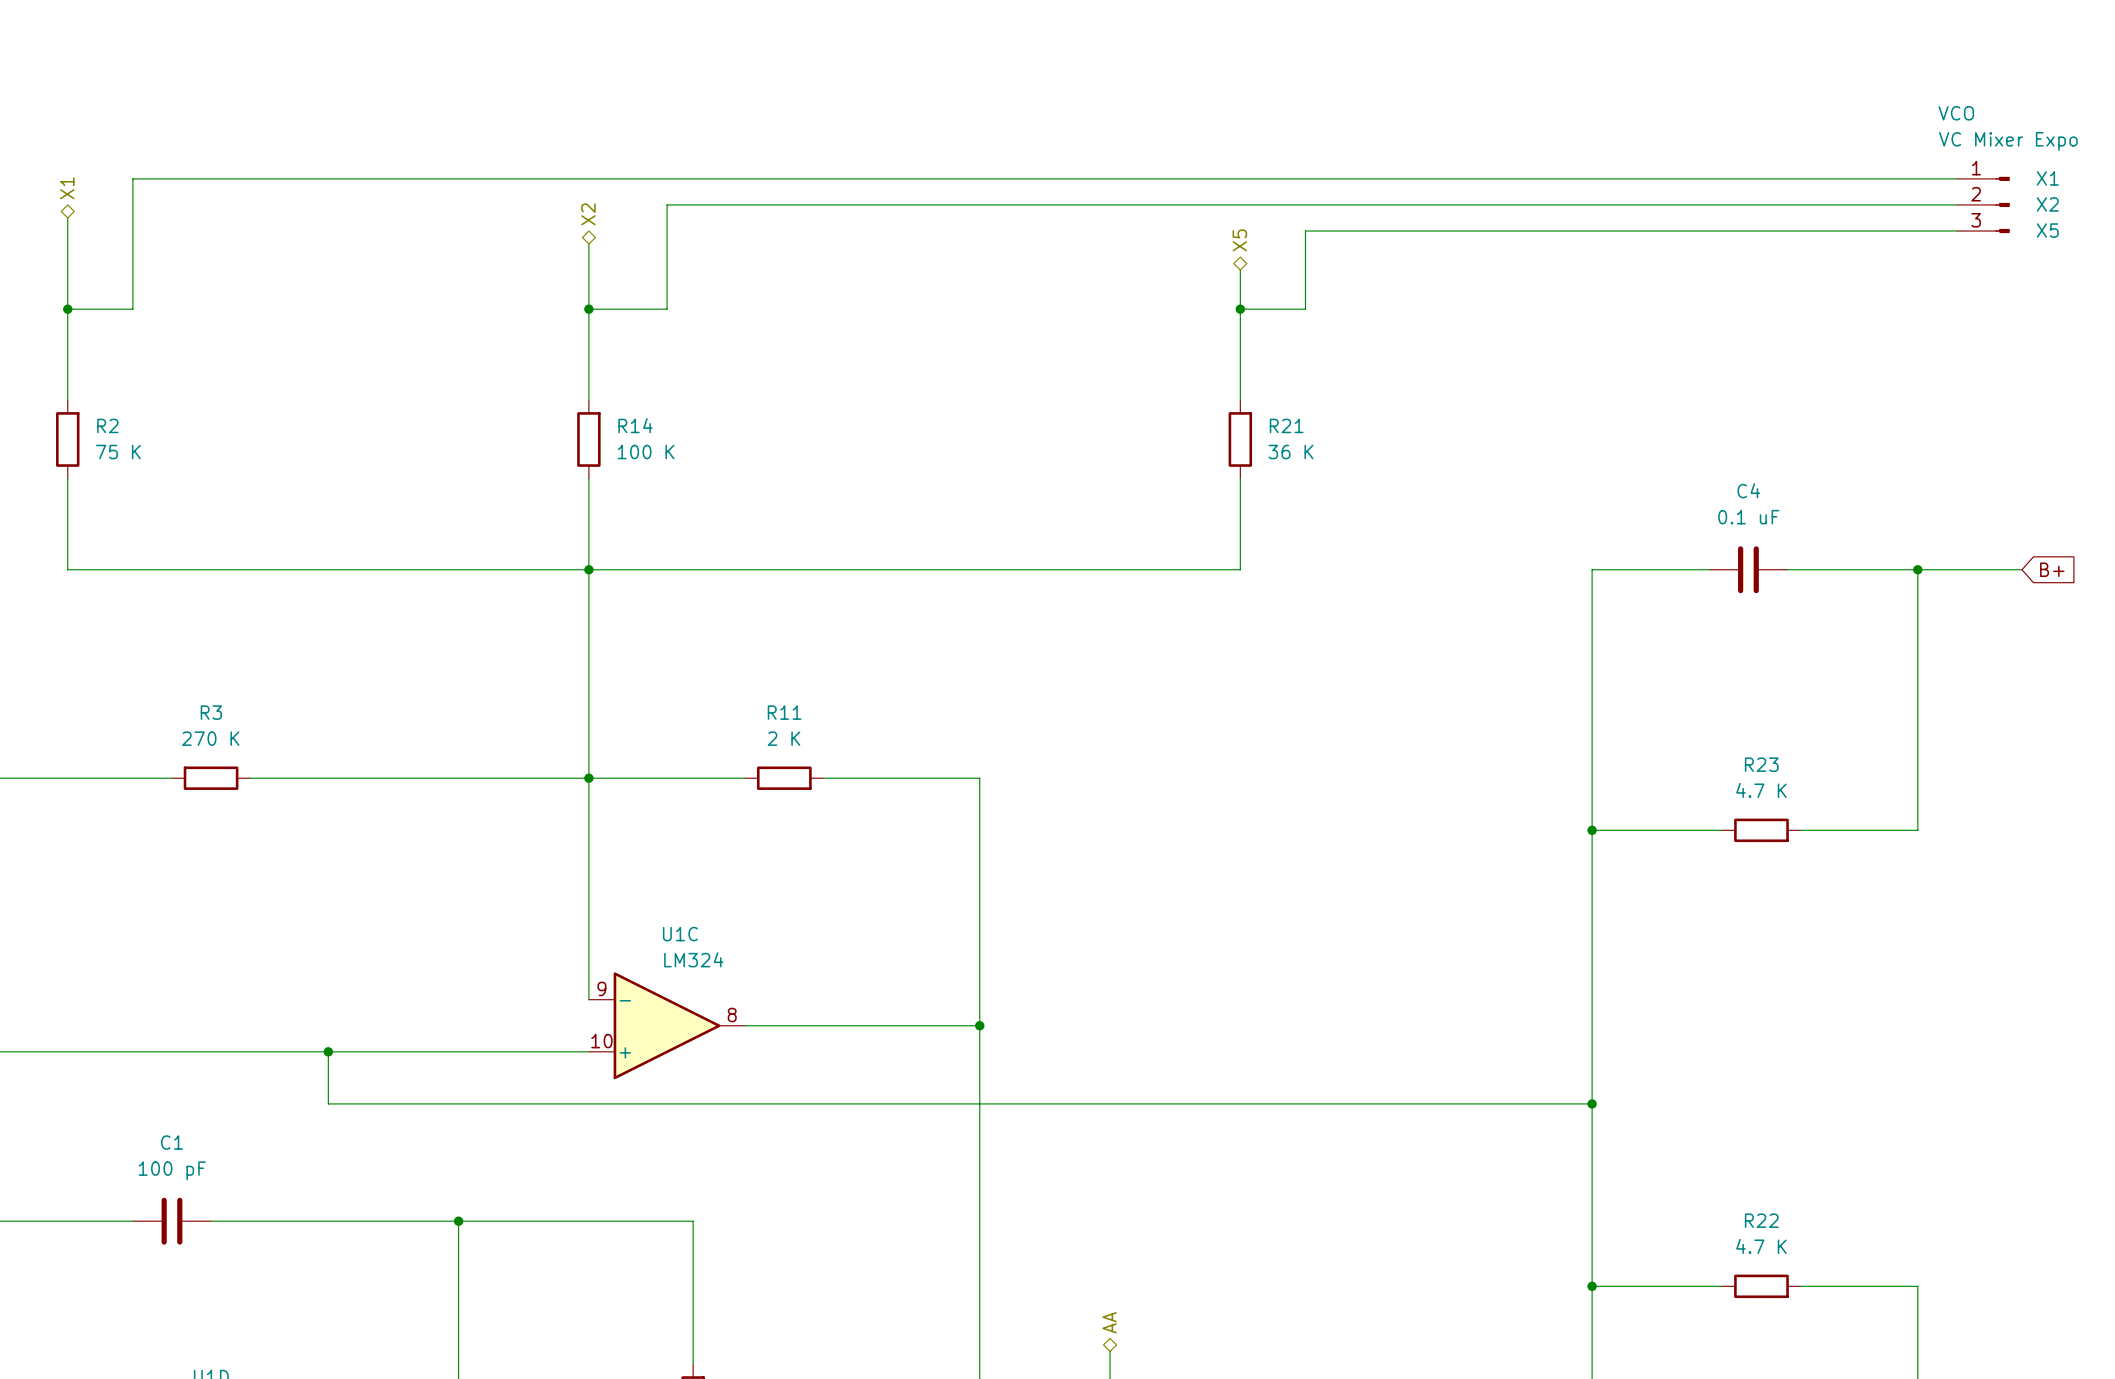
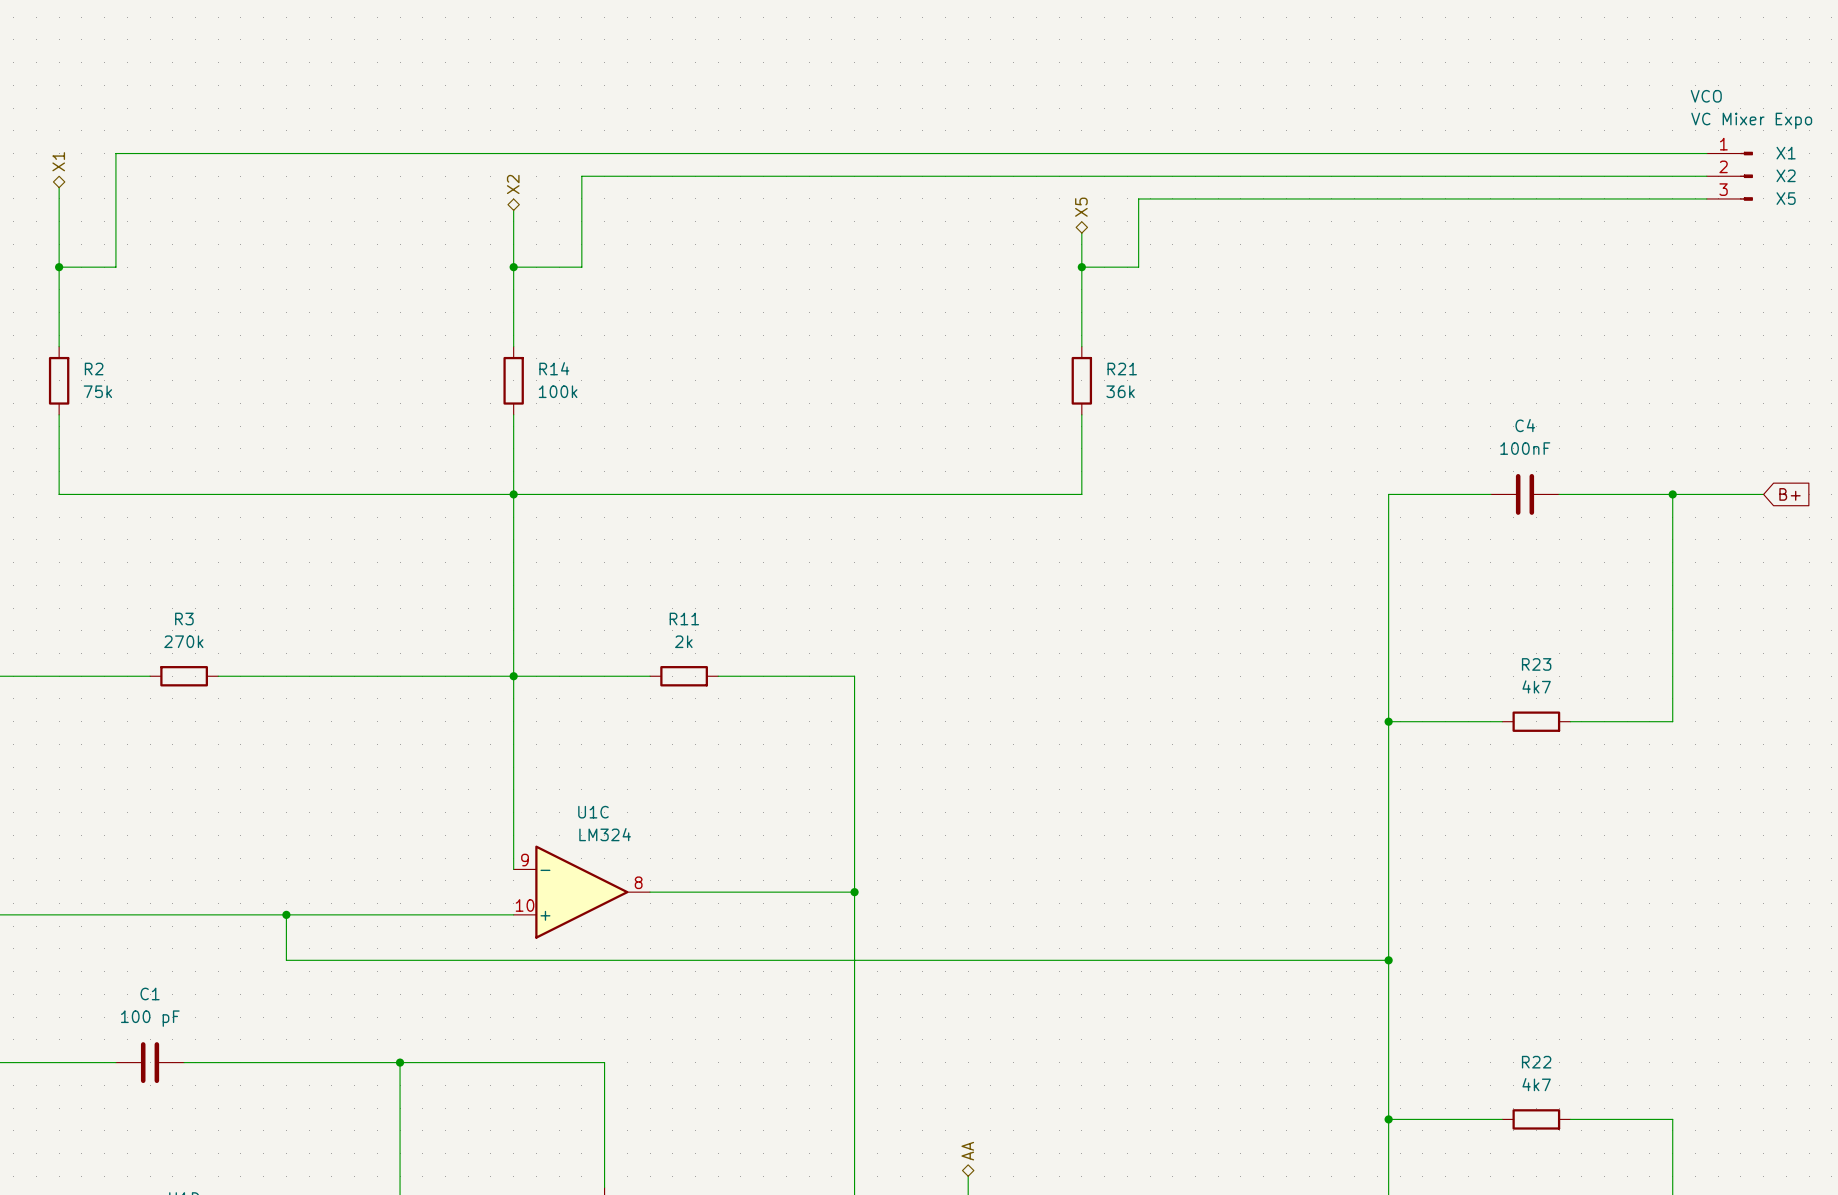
R2 value: 75 K (118, 452) -> 75k (97, 391)
R14 value: 100 K (646, 452) -> 100k (558, 391)
R21 value: 36 K (1290, 452) -> 36k (1120, 391)
C4 value: 0.1 uF (1748, 517) -> 100nF (1525, 448)
R3 value: 270 K (210, 738) -> 270k (183, 641)
R11 value: 2 K (784, 738) -> 2k (683, 641)
R23 value: 4.7 K (1761, 790) -> 4k7 (1536, 686)
R22 value: 4.7 K (1761, 1246) -> 4k7 (1536, 1084)

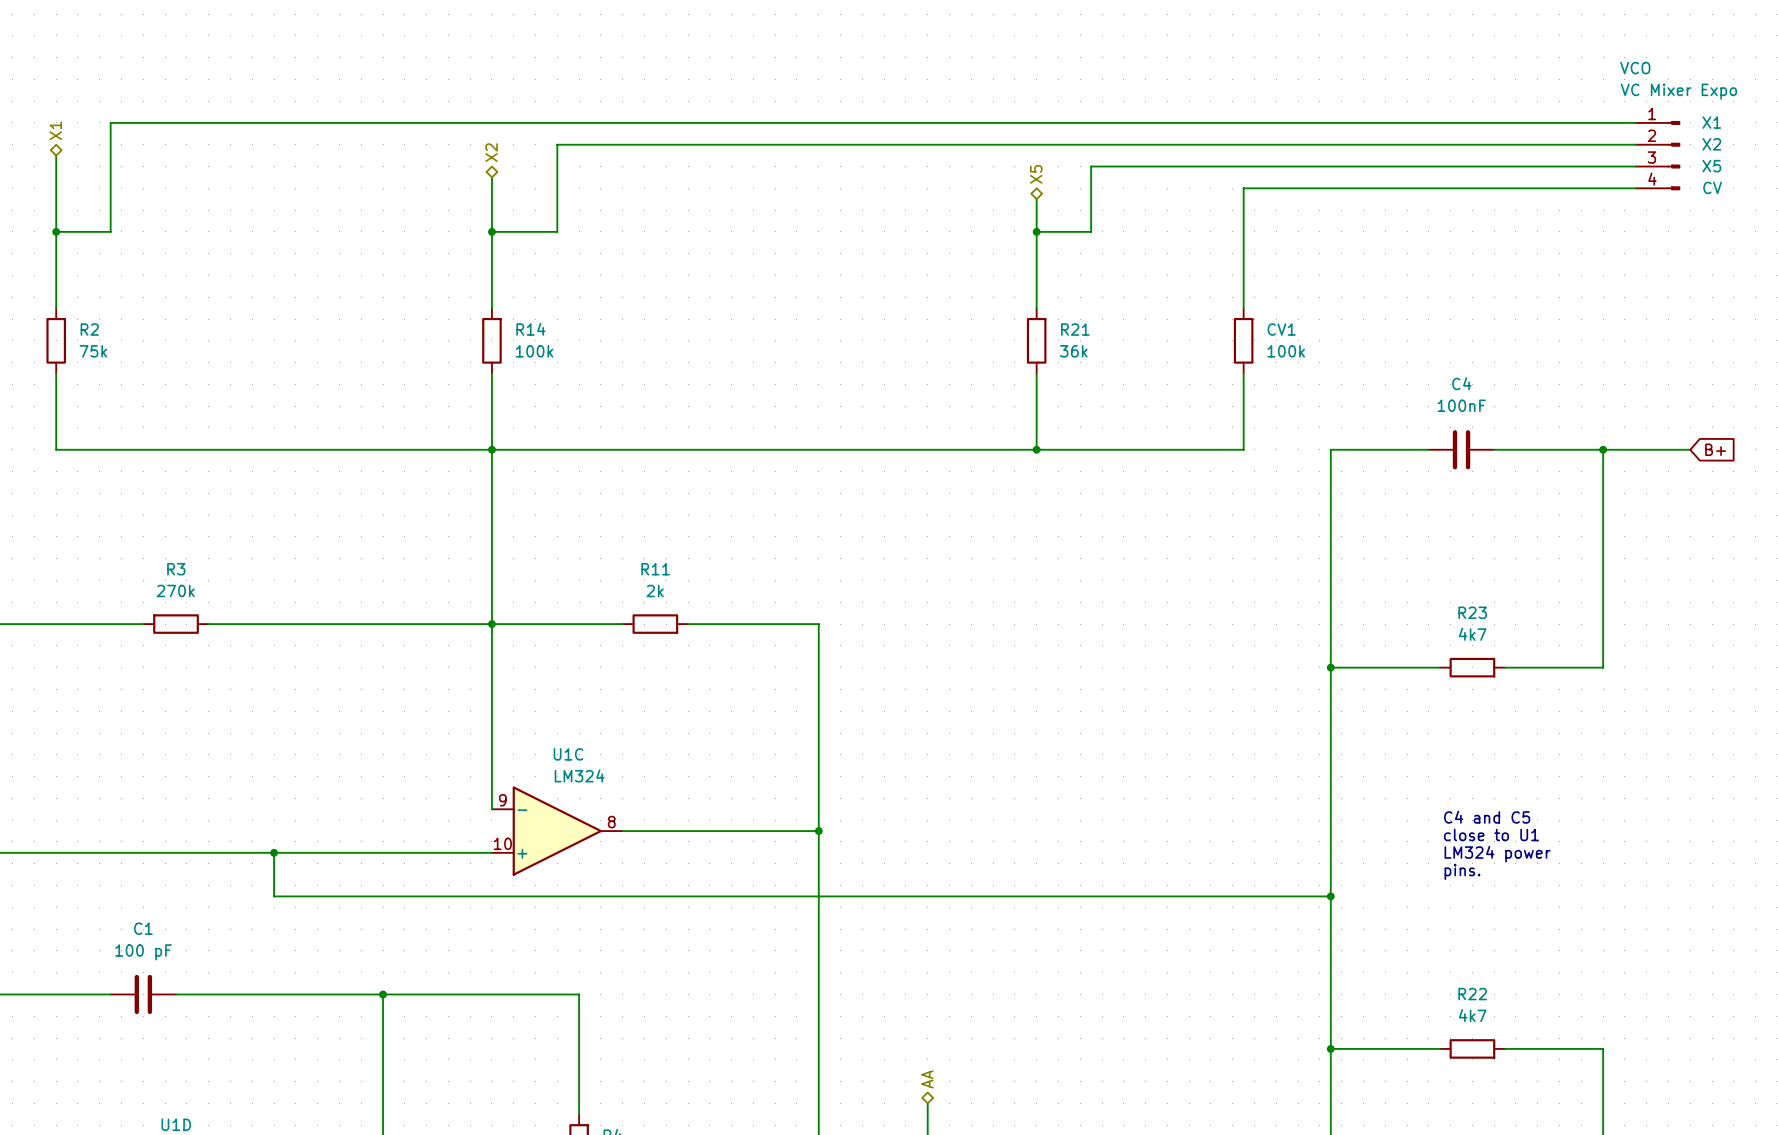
part: none -> VCO (1657, 155)
wire: none -> (1635, 188) (1243, 188) (1243, 308)
CV1: none -> 100k (1243, 340)
wire: none -> (1243, 373) (1243, 449) (1036, 449)
junction: none -> (1036, 449)
text: none -> C4 and C5 (1487, 817)
text: none -> close to U1 (1491, 834)
text: none -> LM324 power (1497, 854)
text: none -> pins. (1462, 871)

